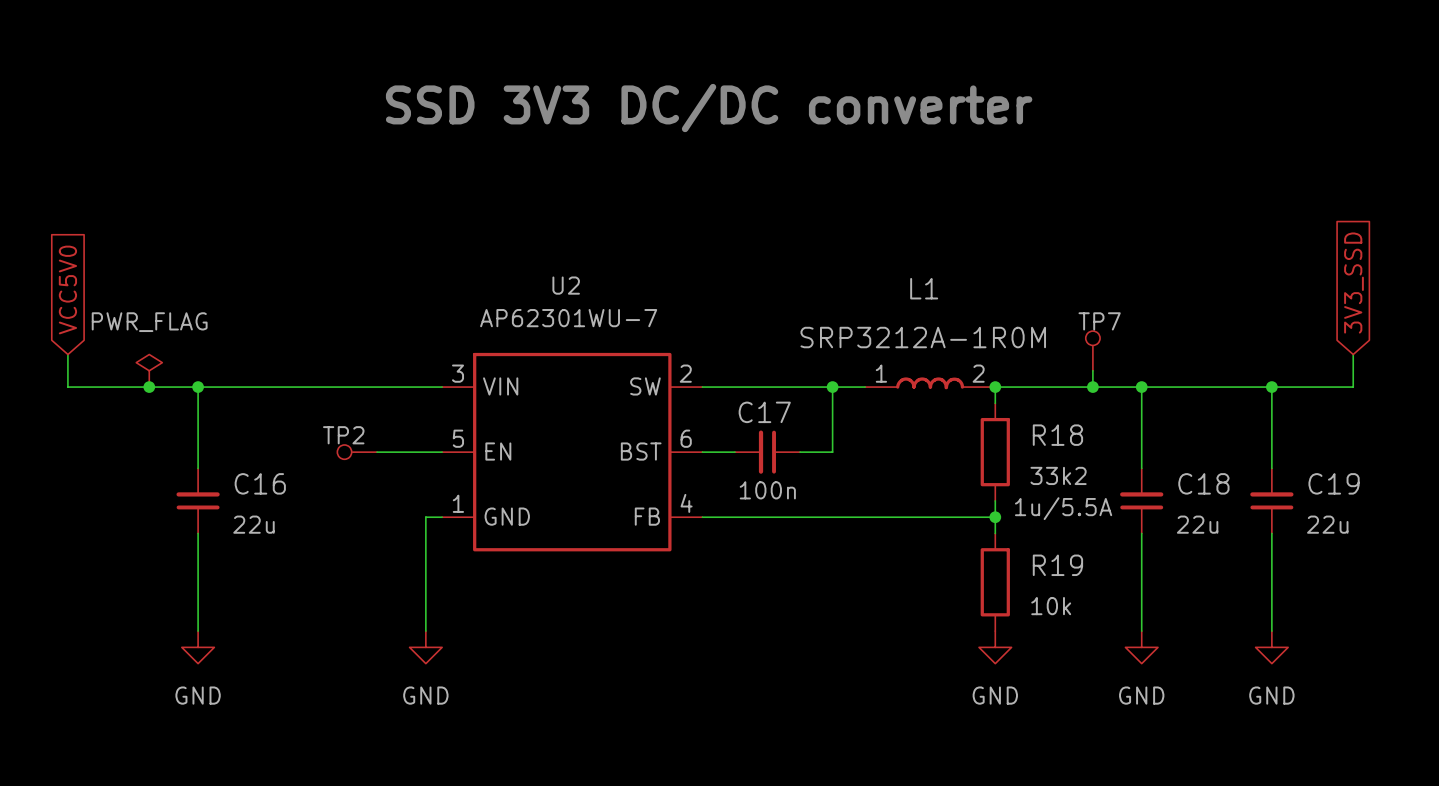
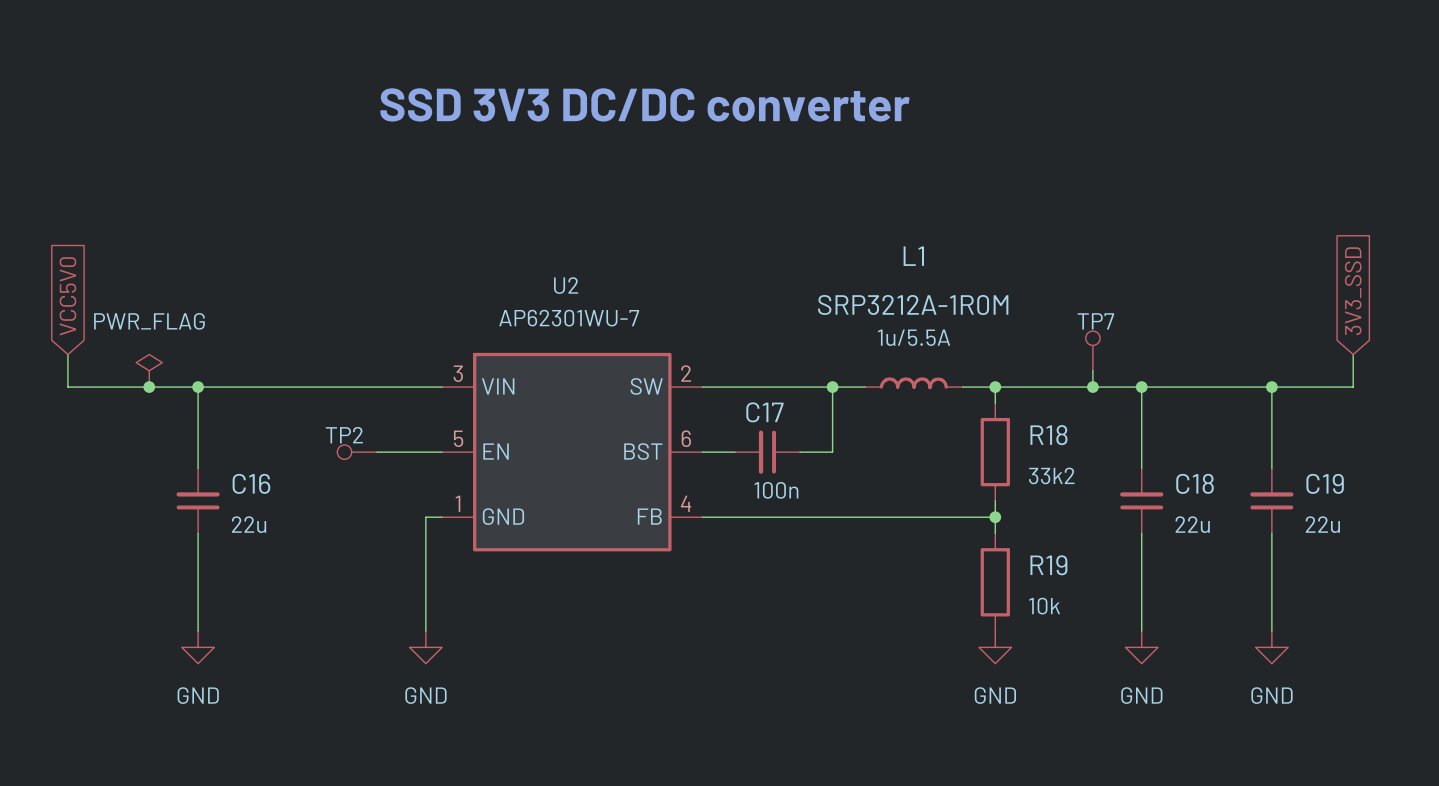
L1 name position: L1 (924, 288) -> L1 (913, 256)
L1 value position: SRP3212A-1R0M (923, 337) -> SRP3212A-1R0M (913, 304)
L1 symbol: [865, 377, 996, 390] -> [865, 377, 963, 390]
L1 text position: 1u/5.5A (1063, 508) -> 1u/5.5A (914, 337)

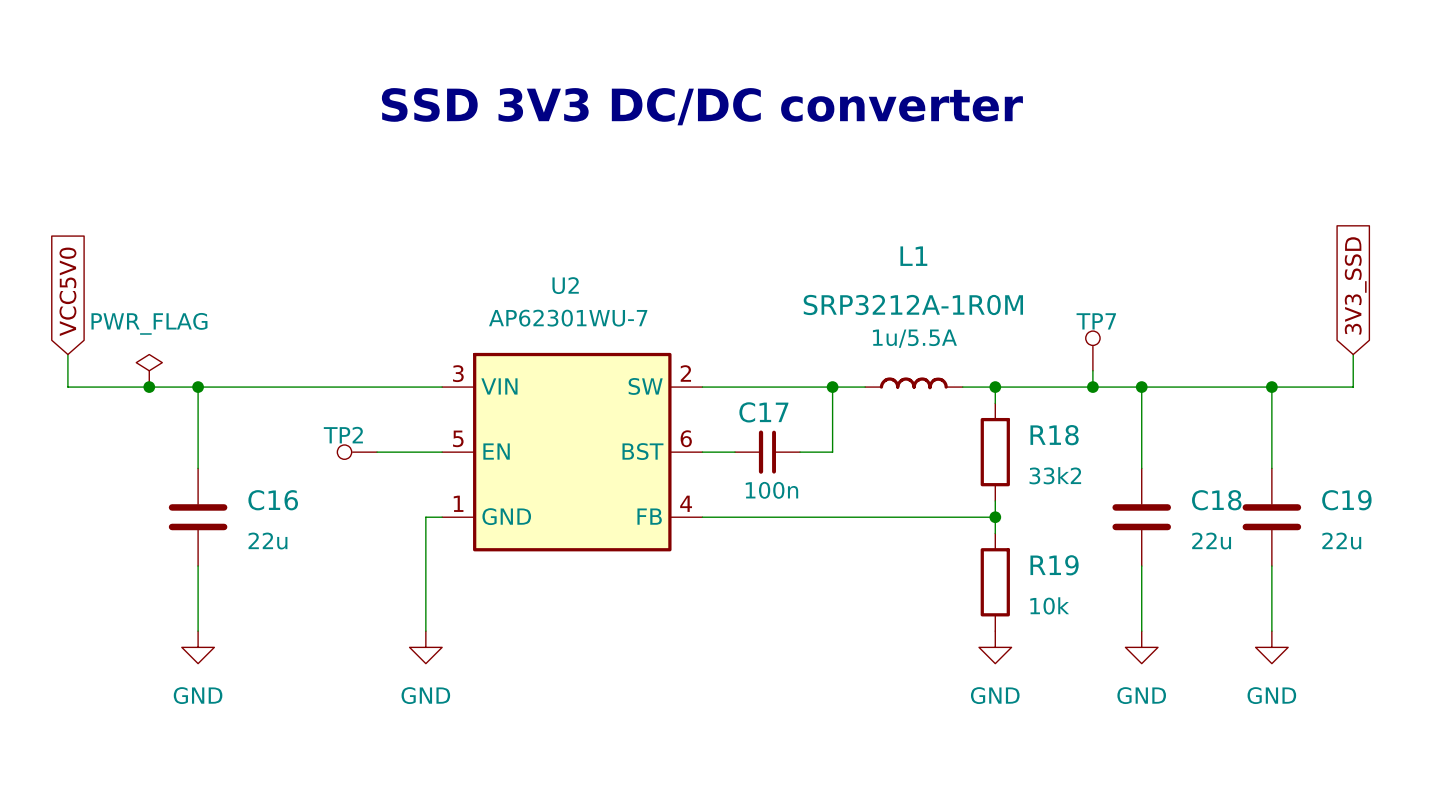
C16 symbol: [176, 468, 220, 534] -> [168, 468, 228, 567]
C18 symbol: [1120, 468, 1164, 534] -> [1112, 468, 1172, 567]
C19 symbol: [1250, 468, 1294, 534] -> [1242, 468, 1302, 567]

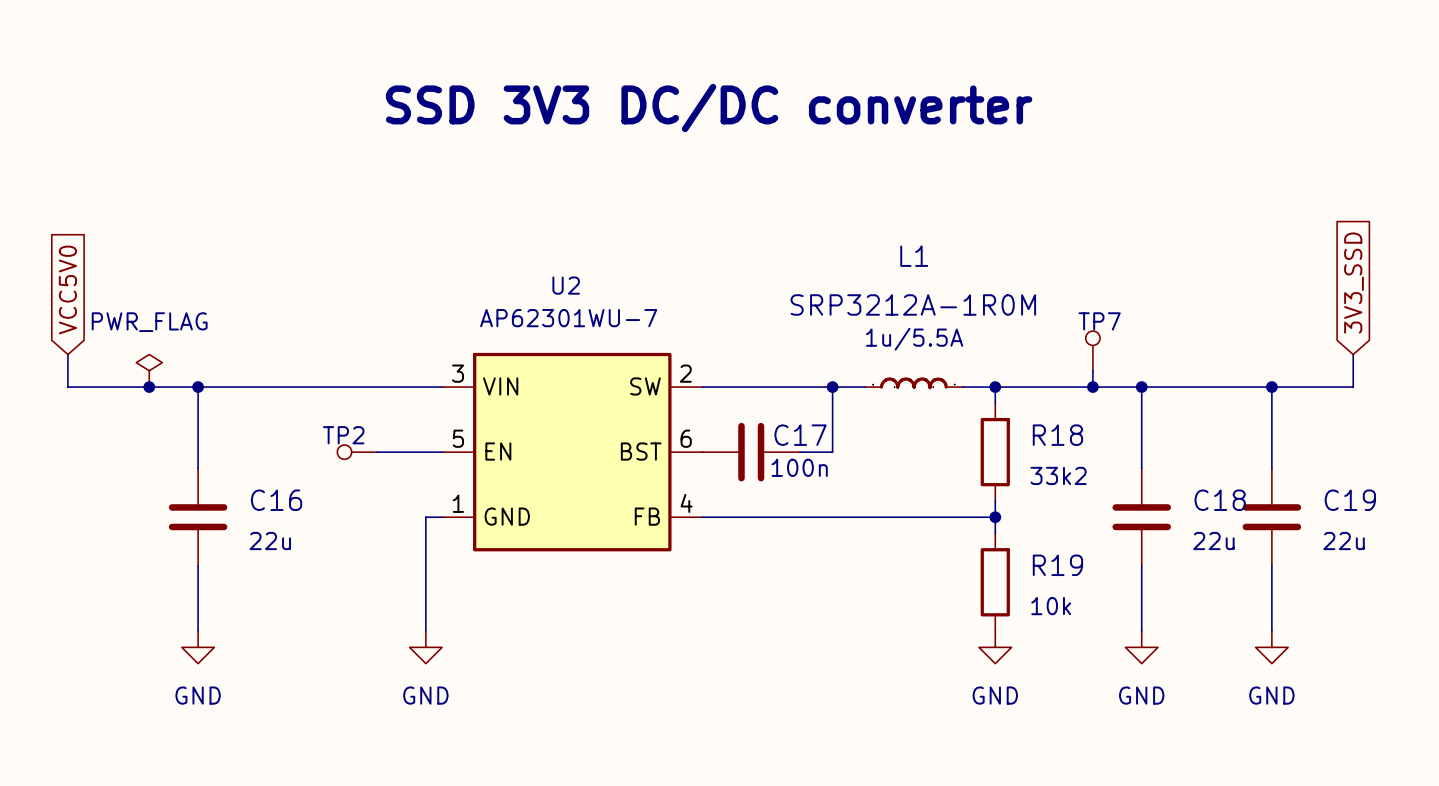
C17 name position: C17 (763, 412) -> C17 (800, 435)
C17 symbol: [734, 430, 801, 474] -> [702, 422, 801, 482]
C17 text position: 100n (771, 490) -> 100n (799, 467)

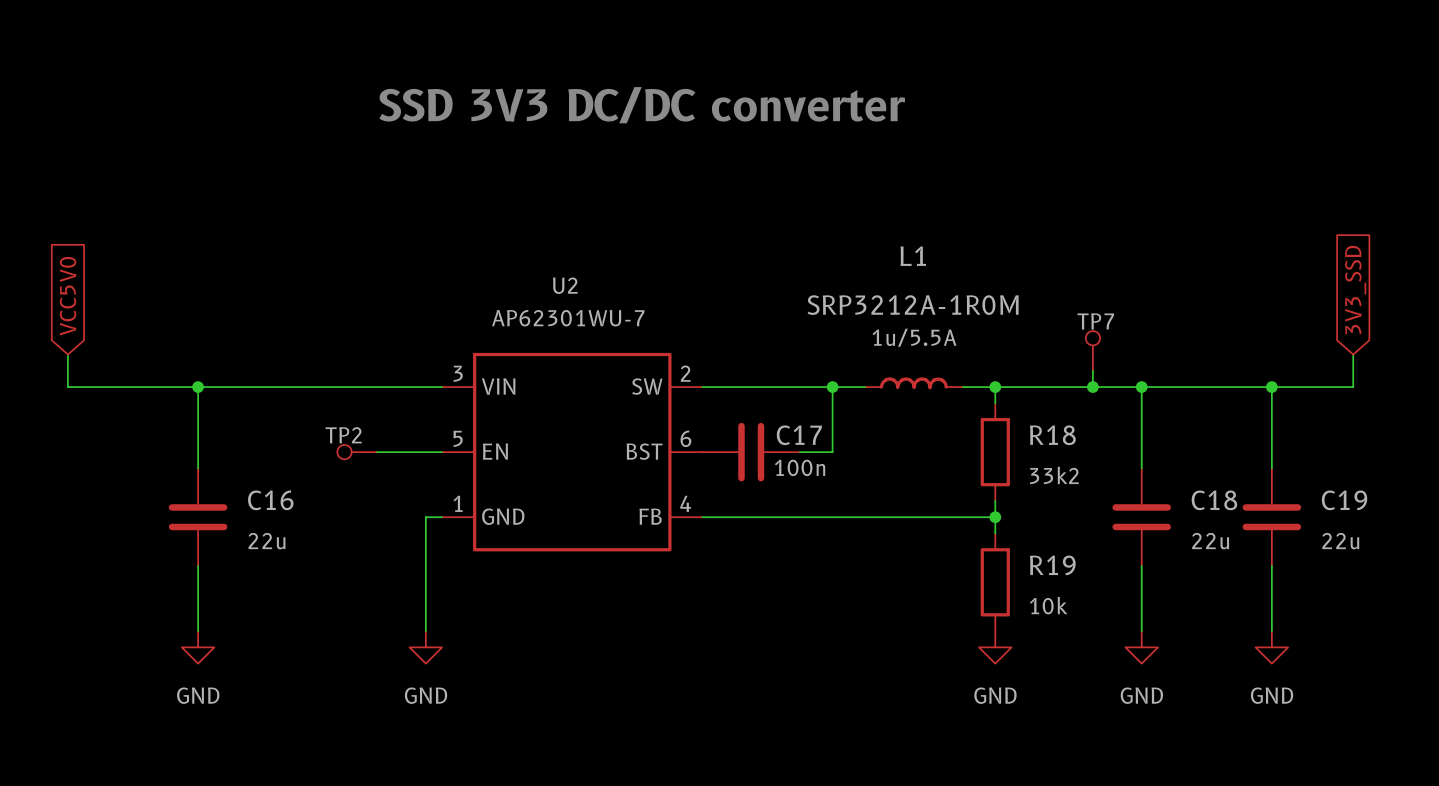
power symbol: PWR_FLAG (149, 370) -> none
junction: (149, 387) -> none

